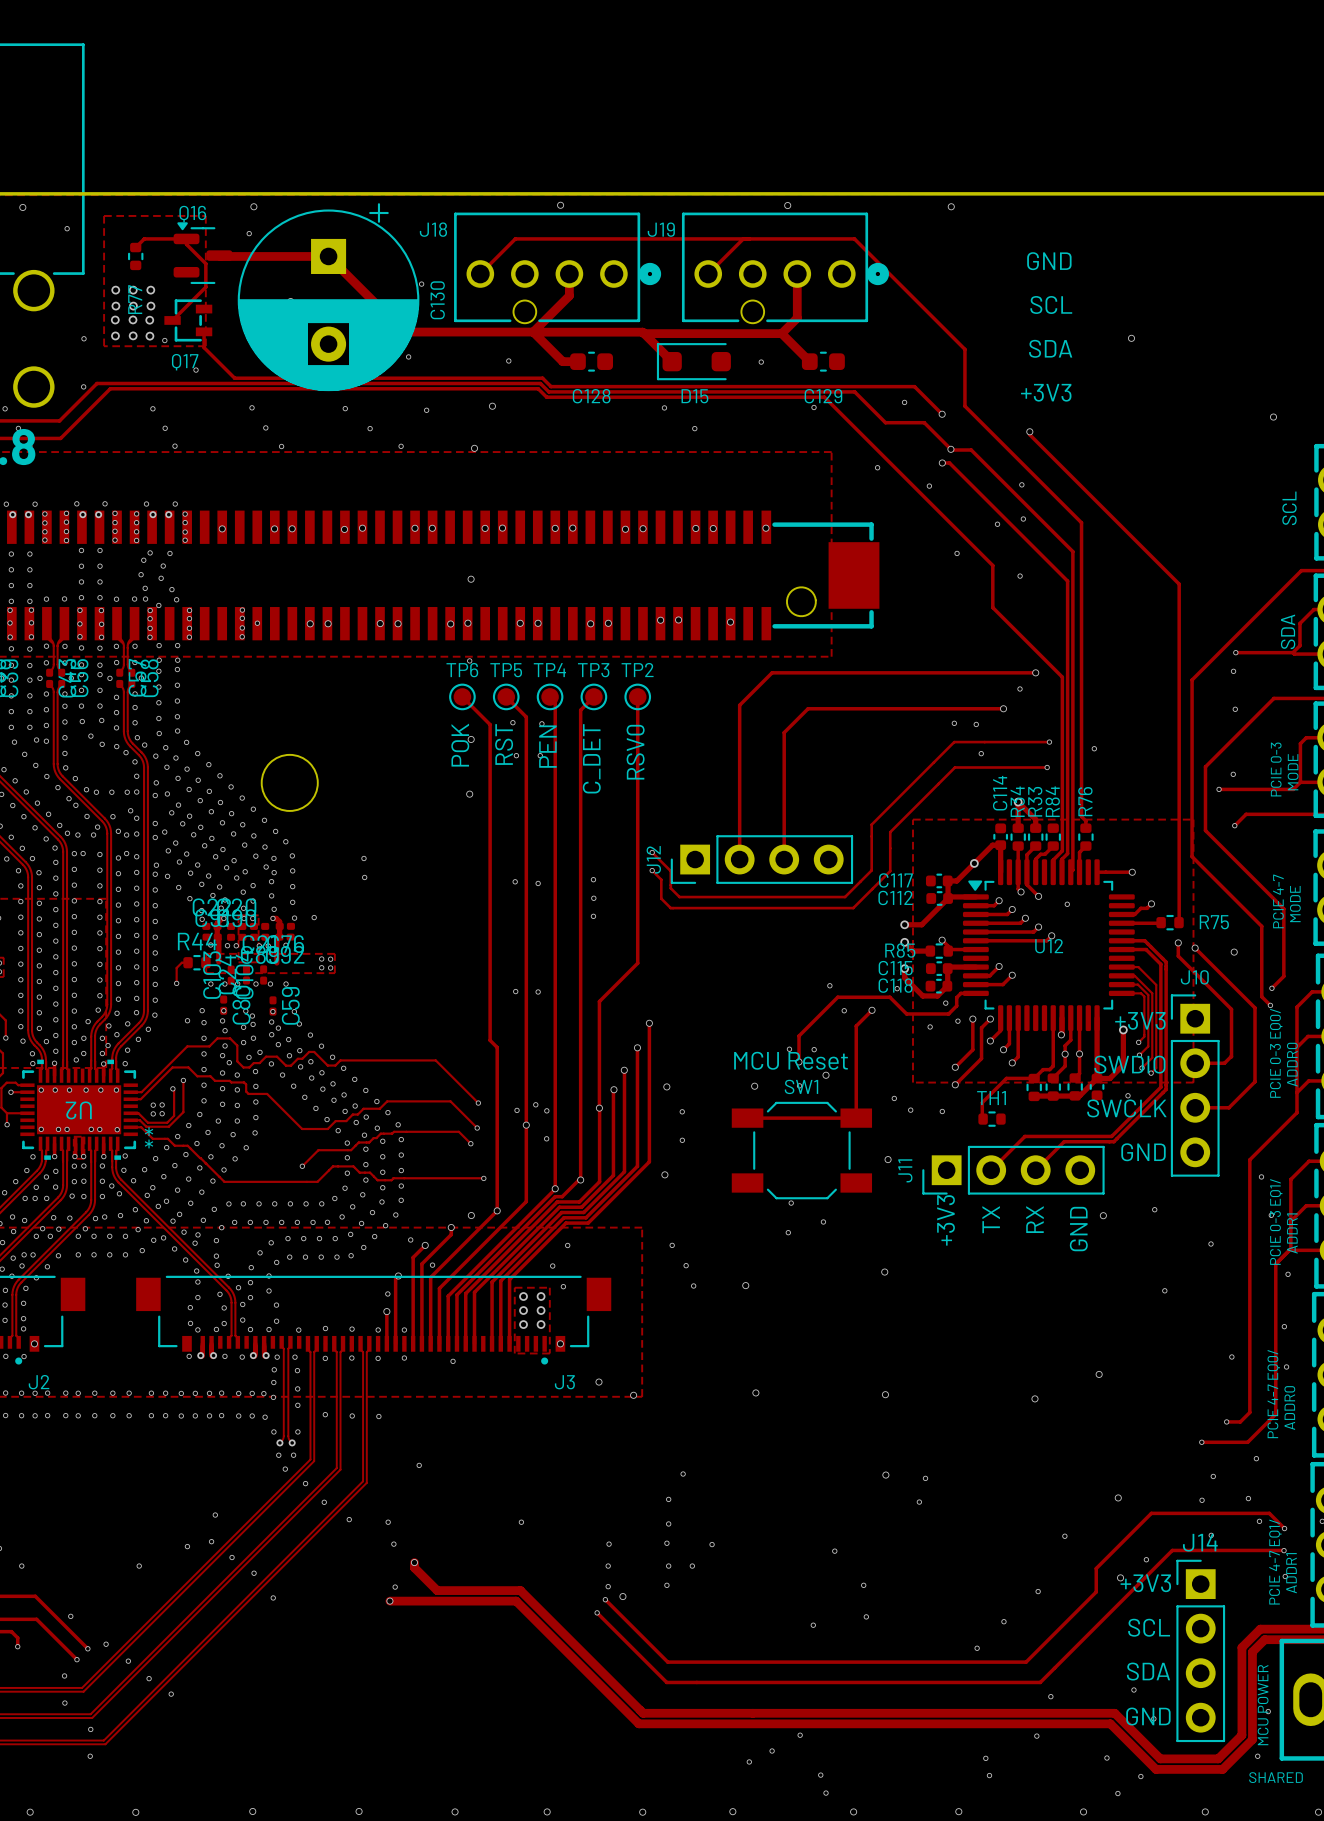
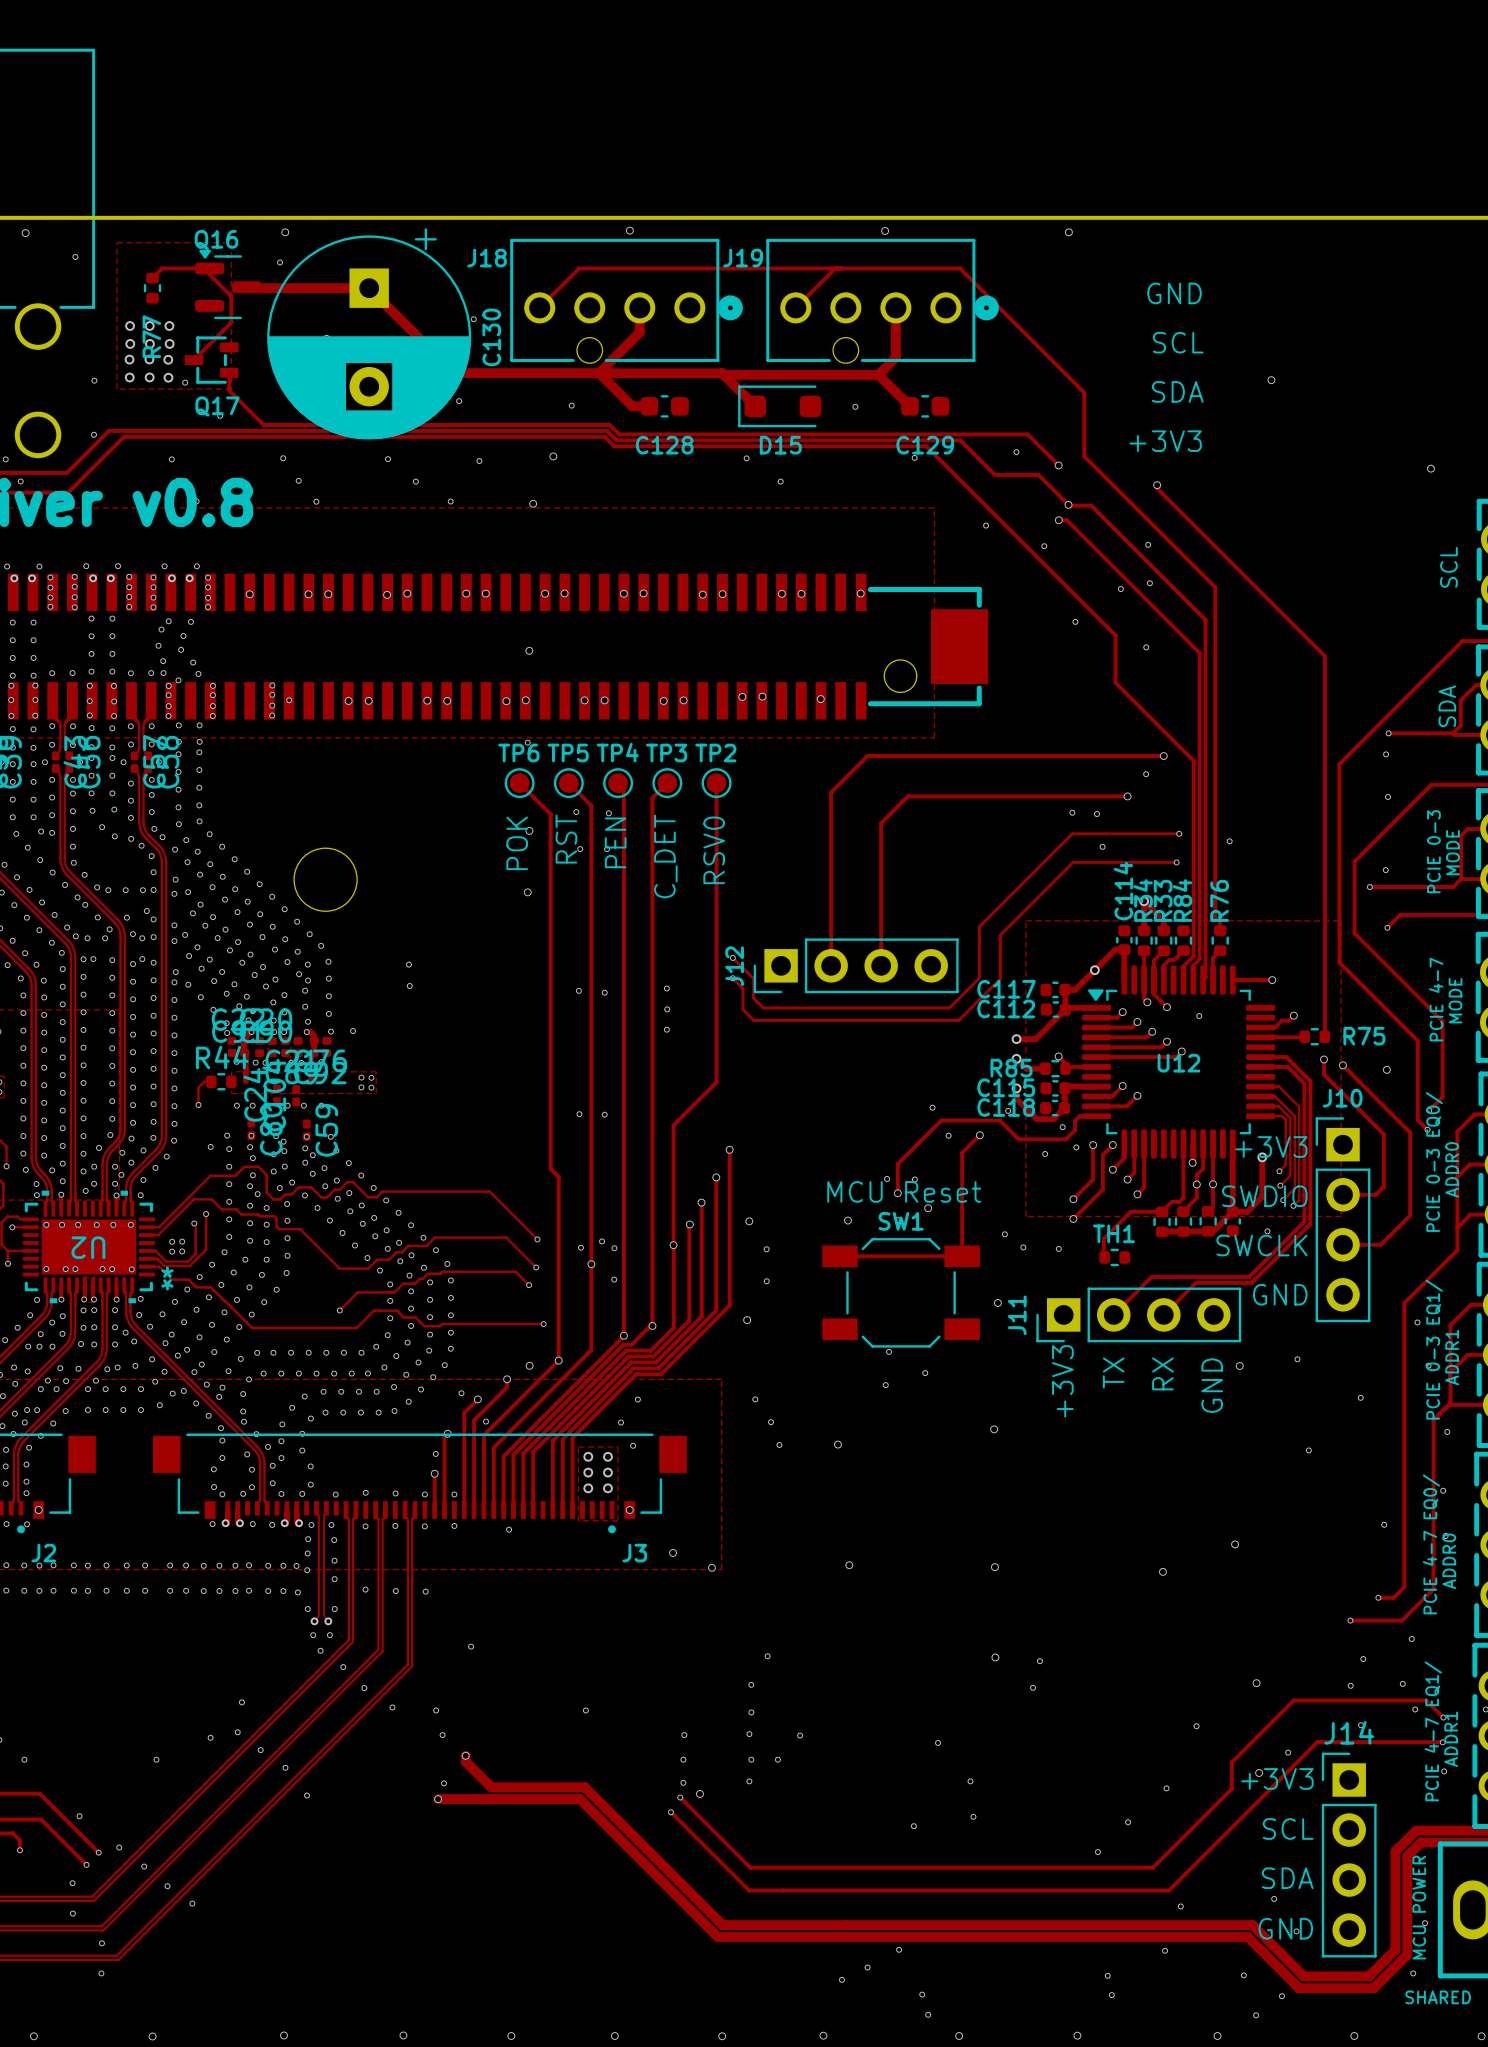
C103: (231, 975) -> none

